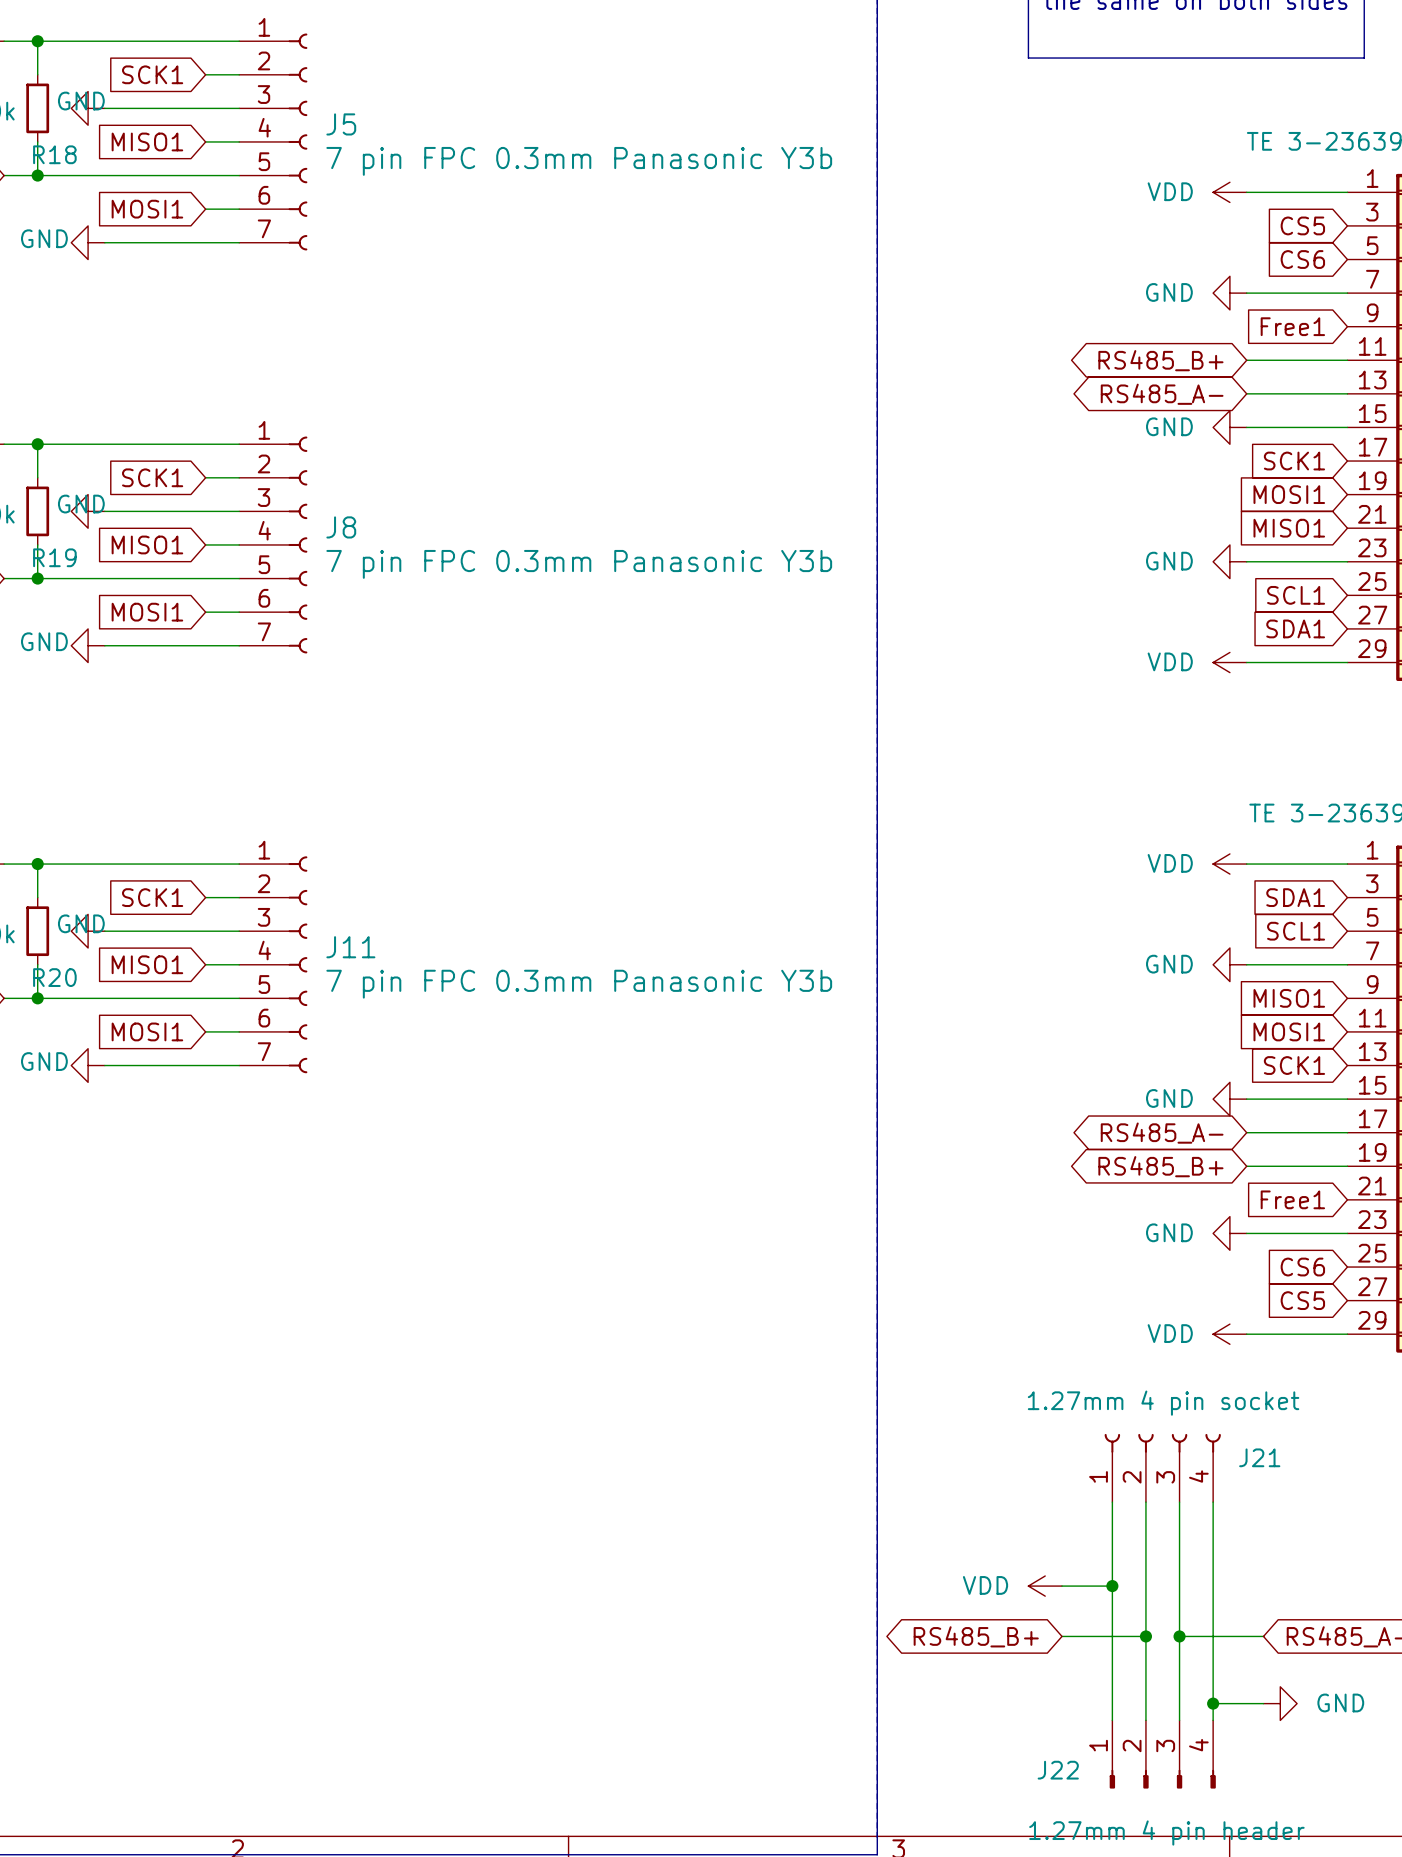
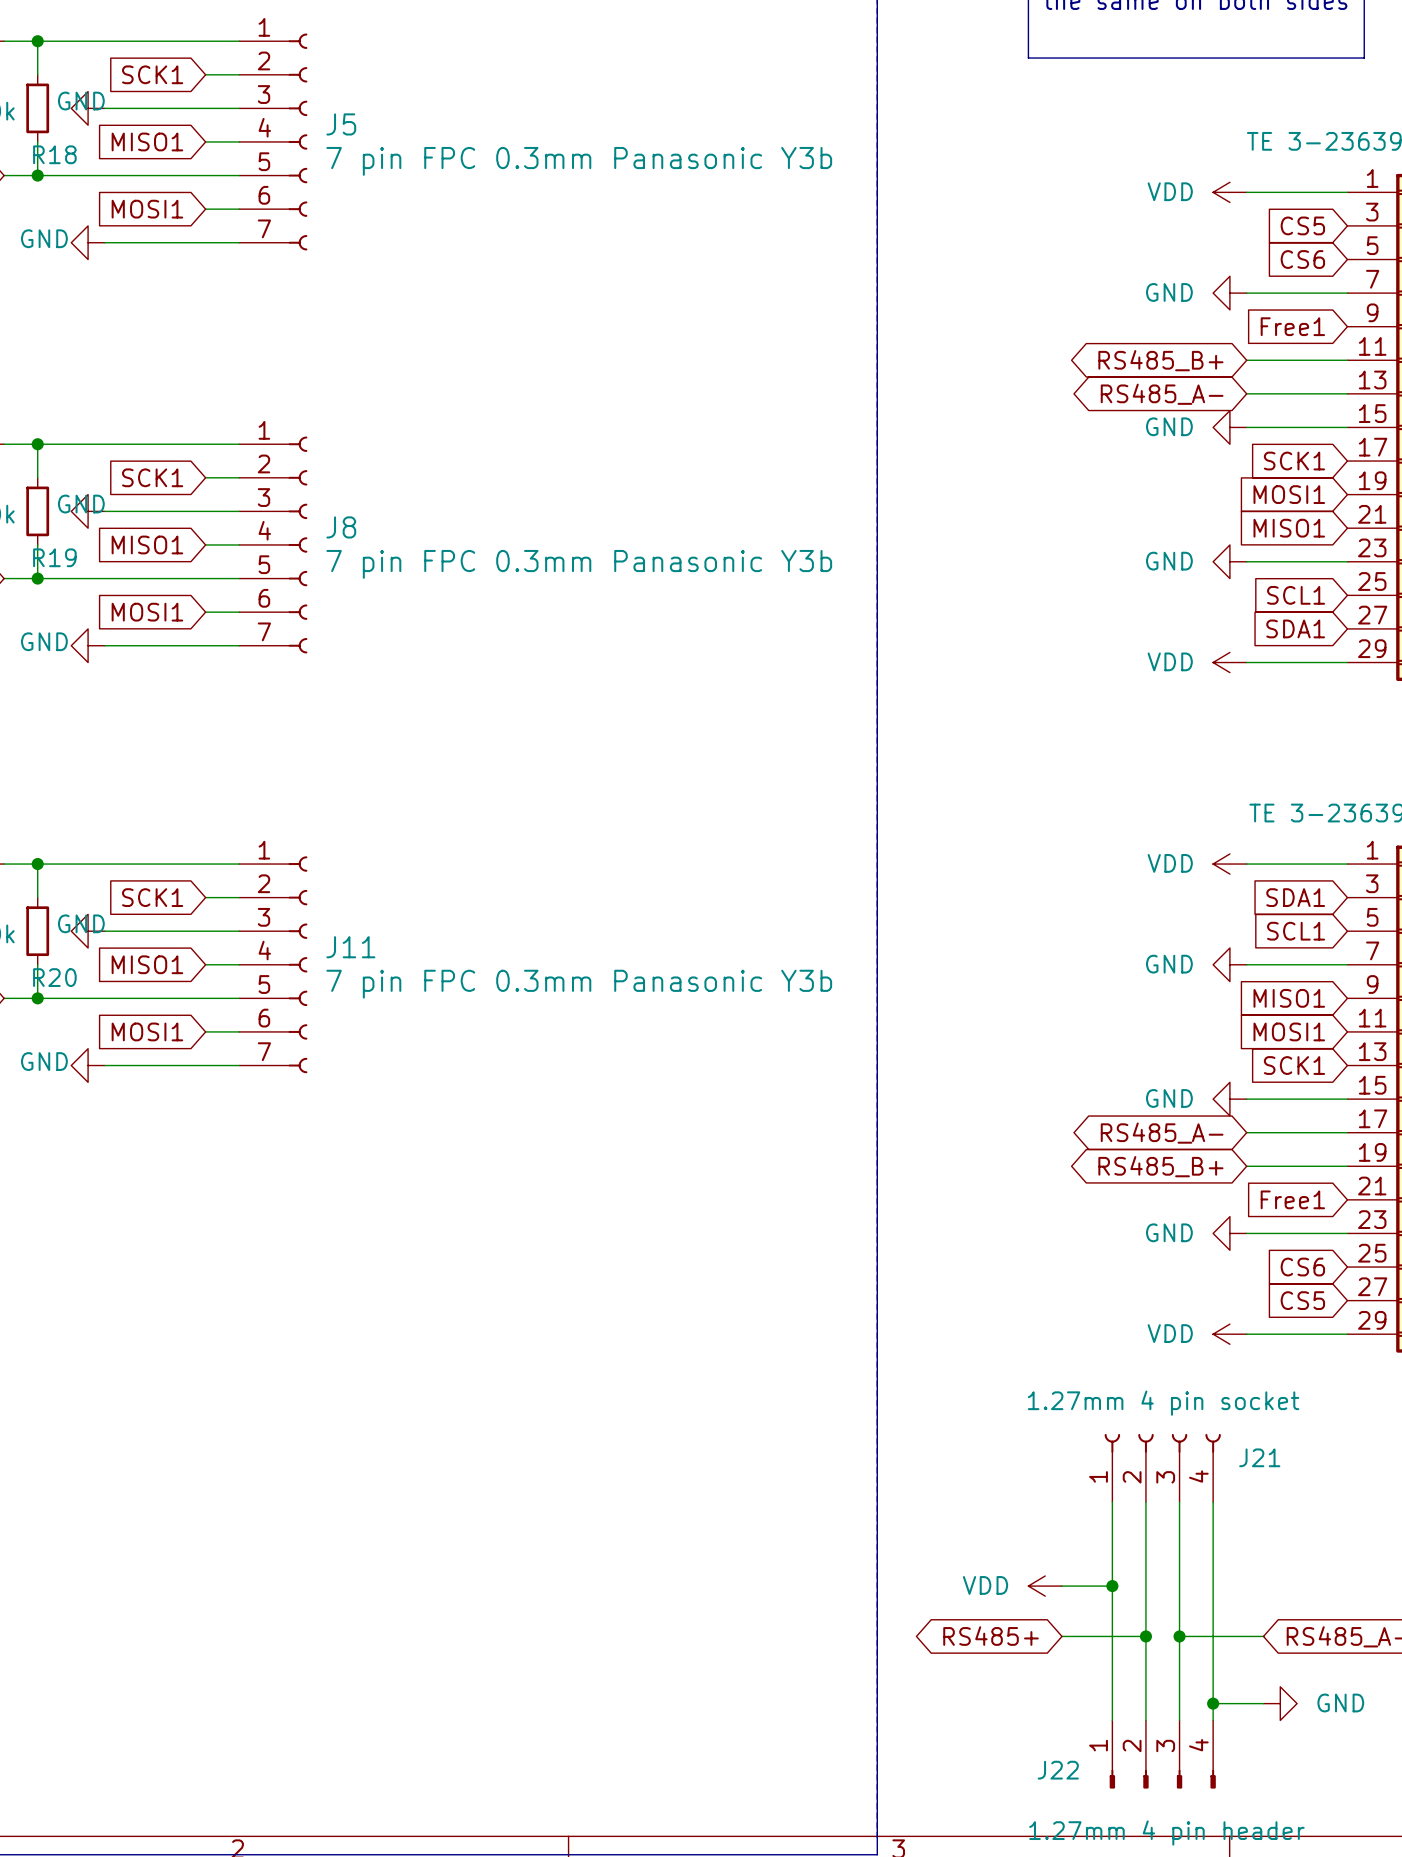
global label: RS485_B+ (976, 1636) -> RS485+ (991, 1636)

